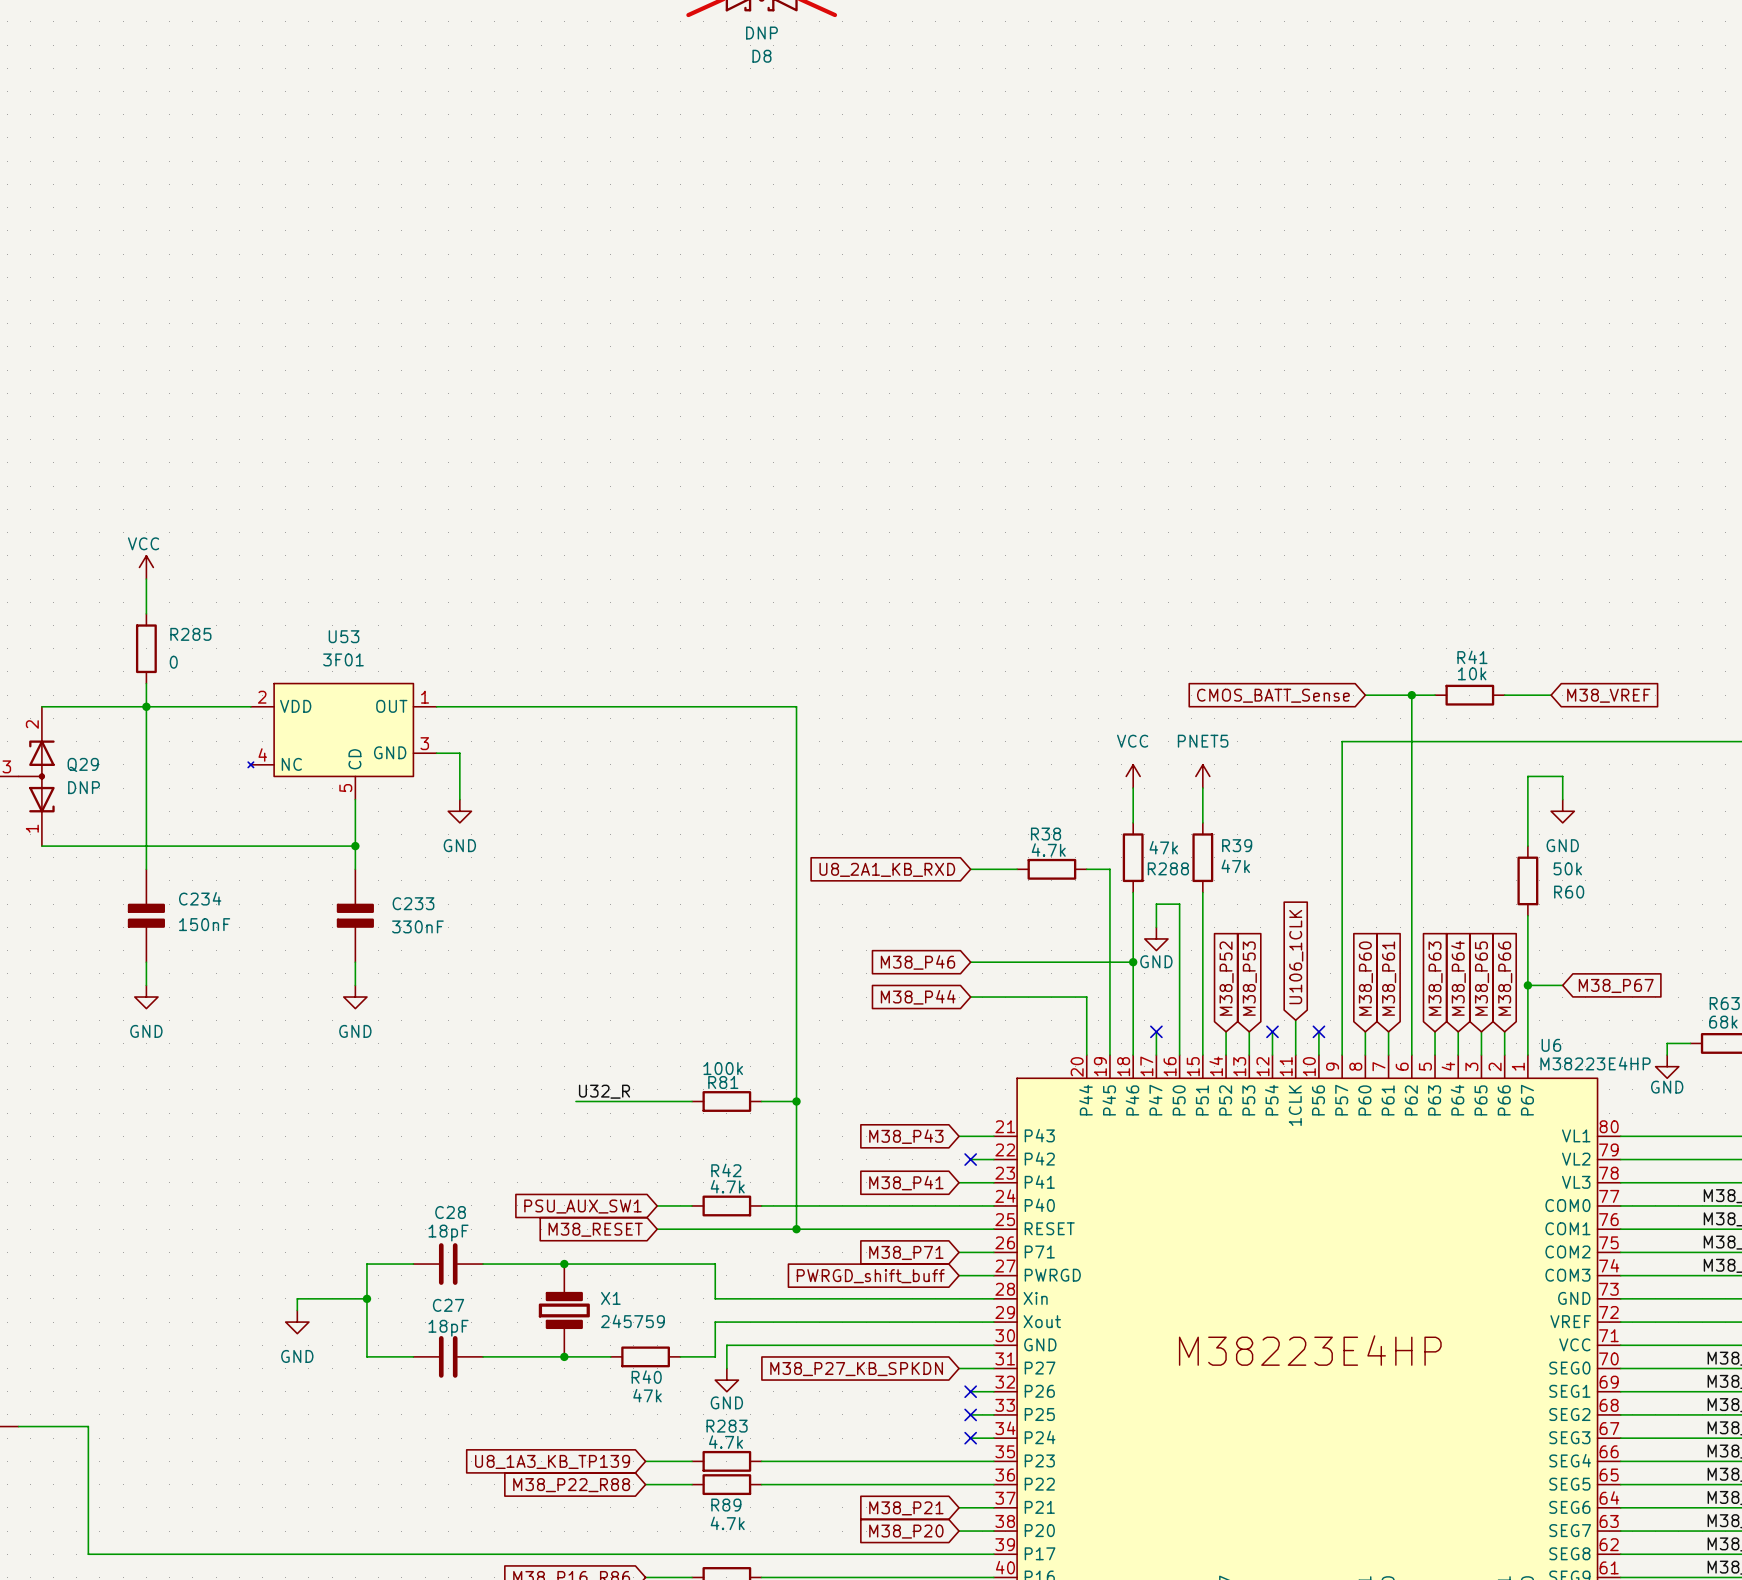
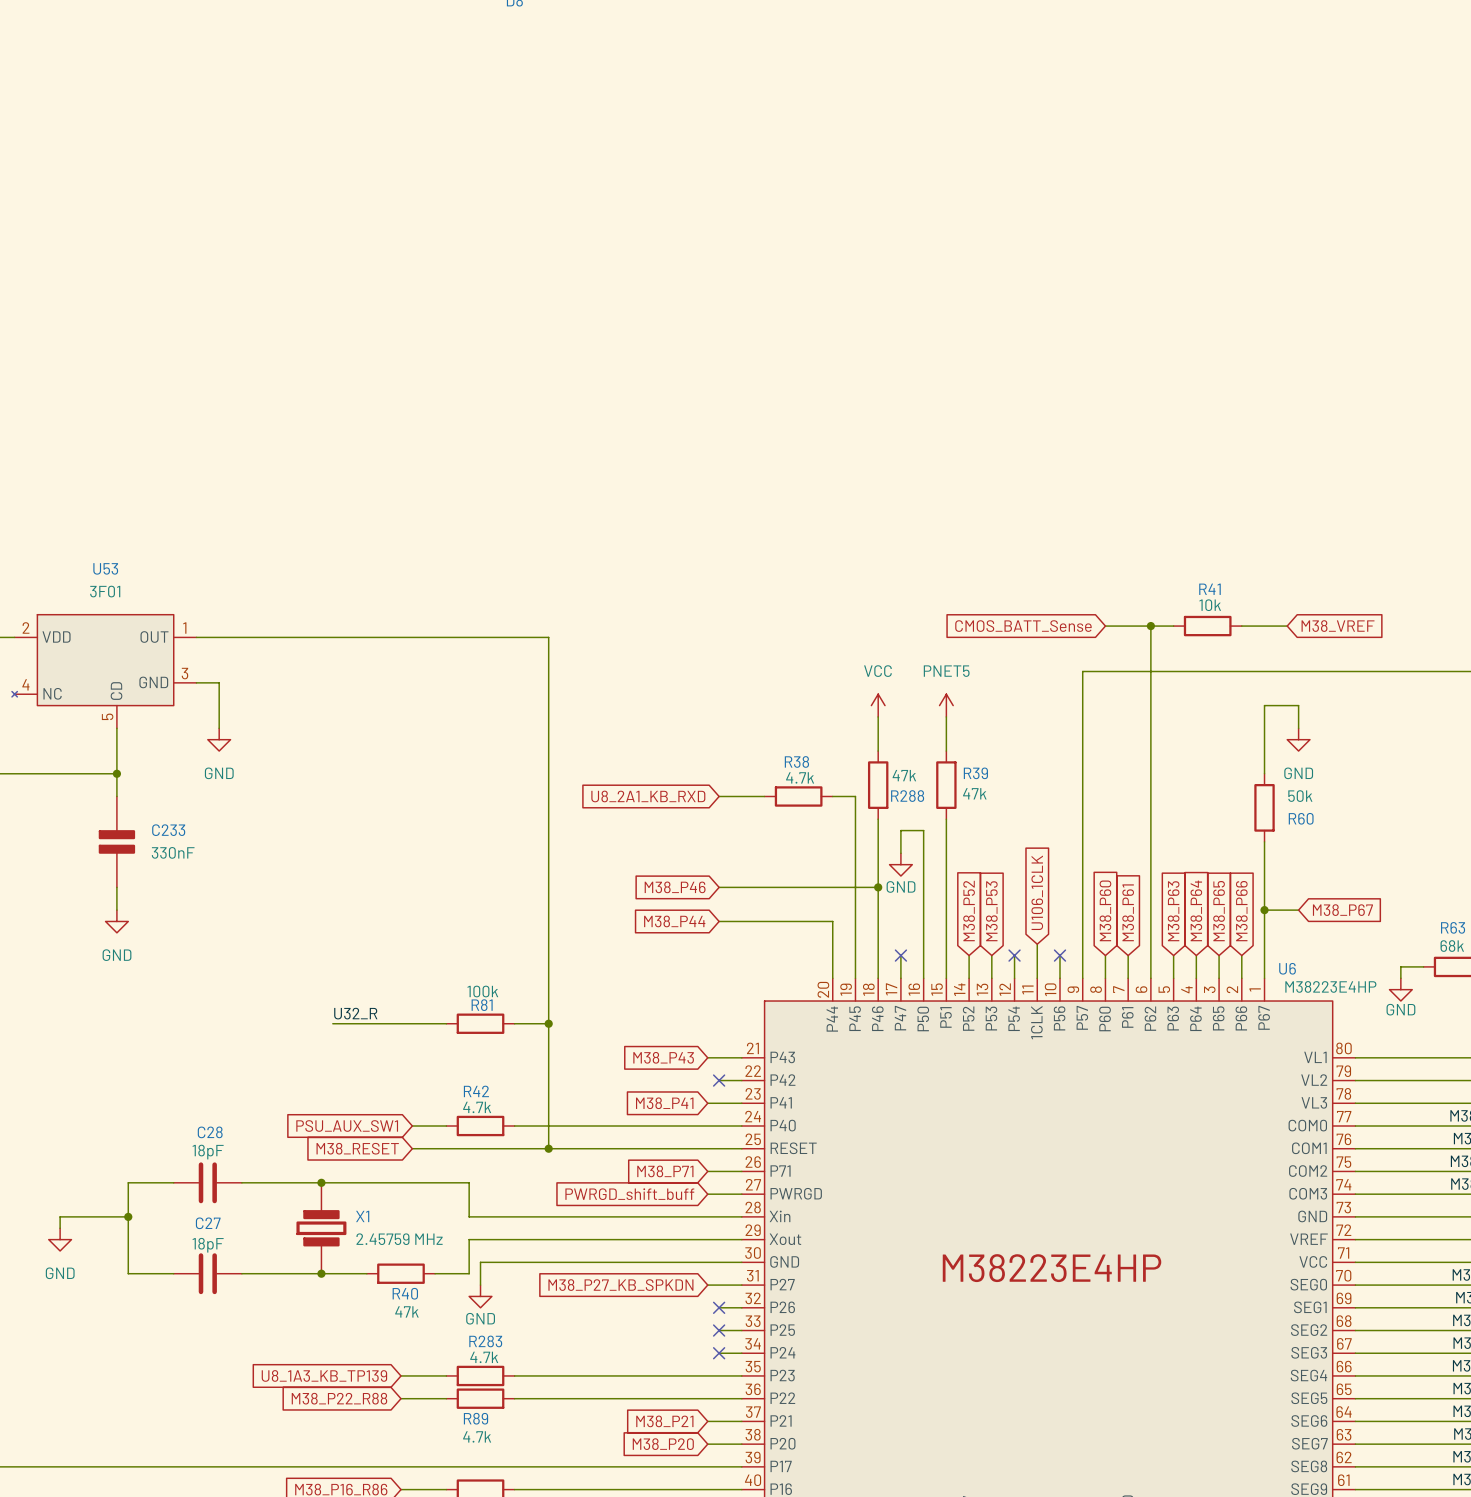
X1 value: 245759 (632, 1321) -> 2.45759 MHz (399, 1239)

